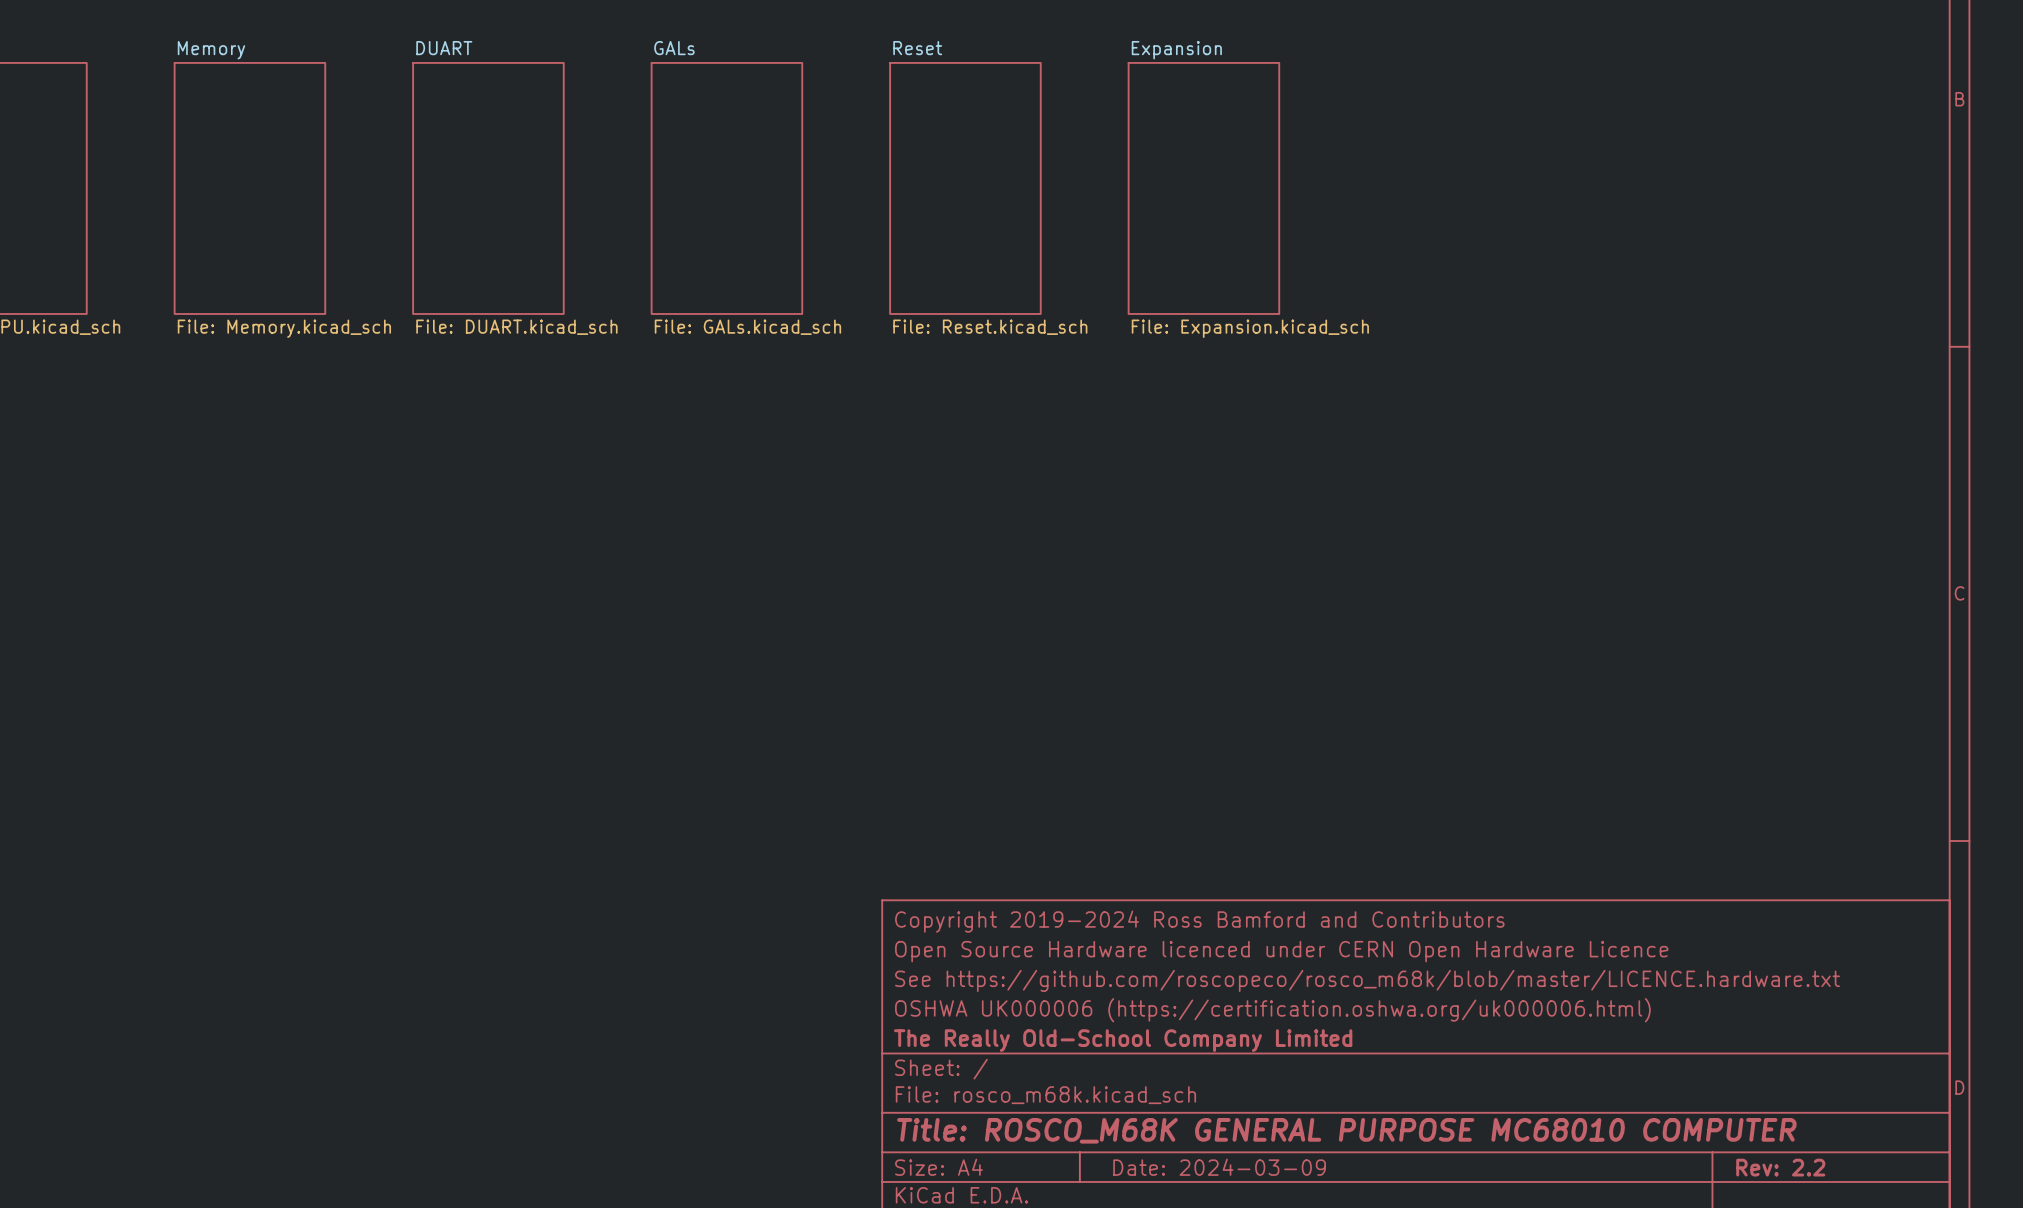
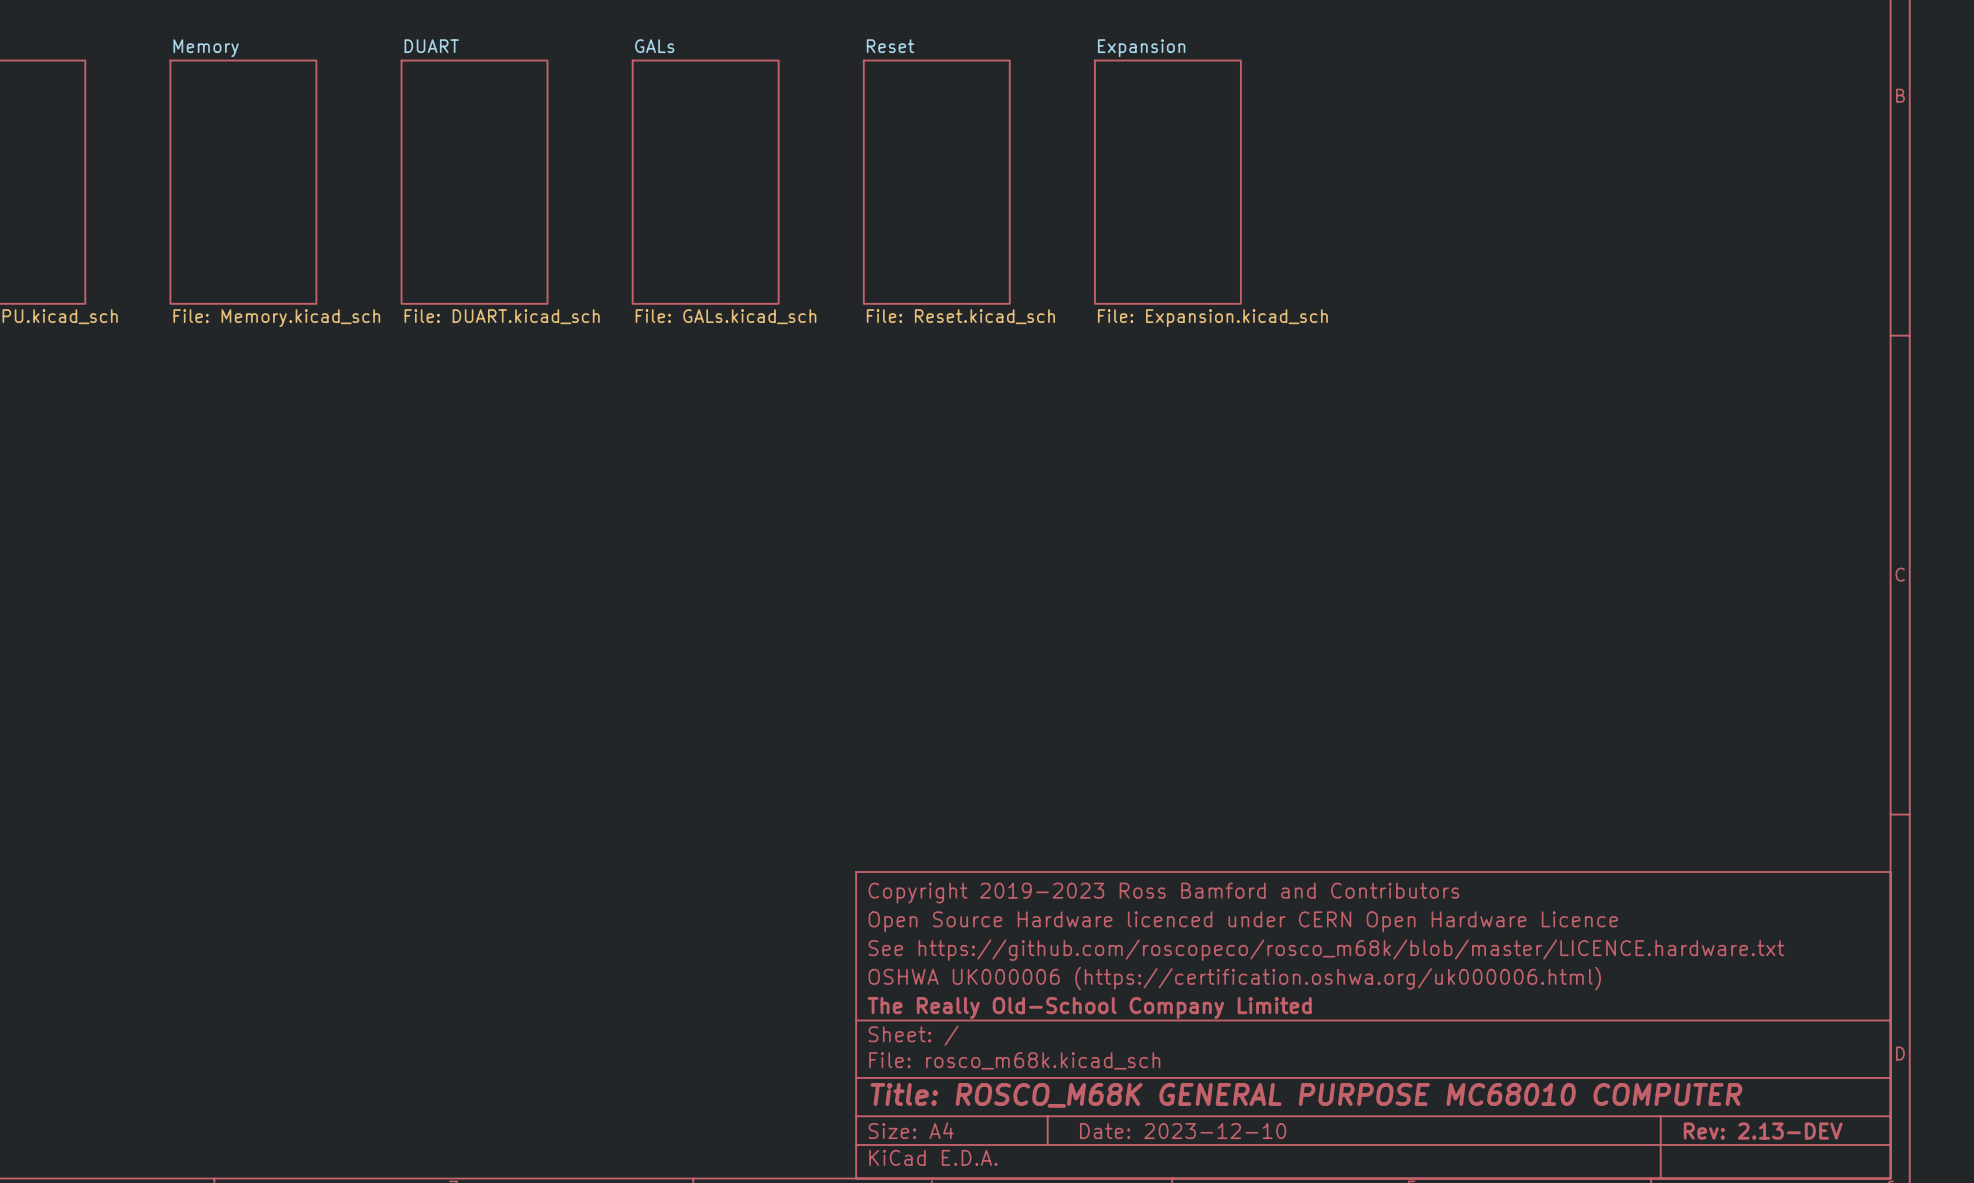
title block: Copyright 2019-2024 Ross Bamford and Contributors (1199, 921) -> Copyright 2019-2023 Ross Bamford and Contributors (1163, 893)
title block: Date: 2024-03-09 (1219, 1167) -> Date: 2023-12-10 (1183, 1131)
title block: Rev: 2.2 (1780, 1167) -> Rev: 2.13-DEV (1763, 1131)

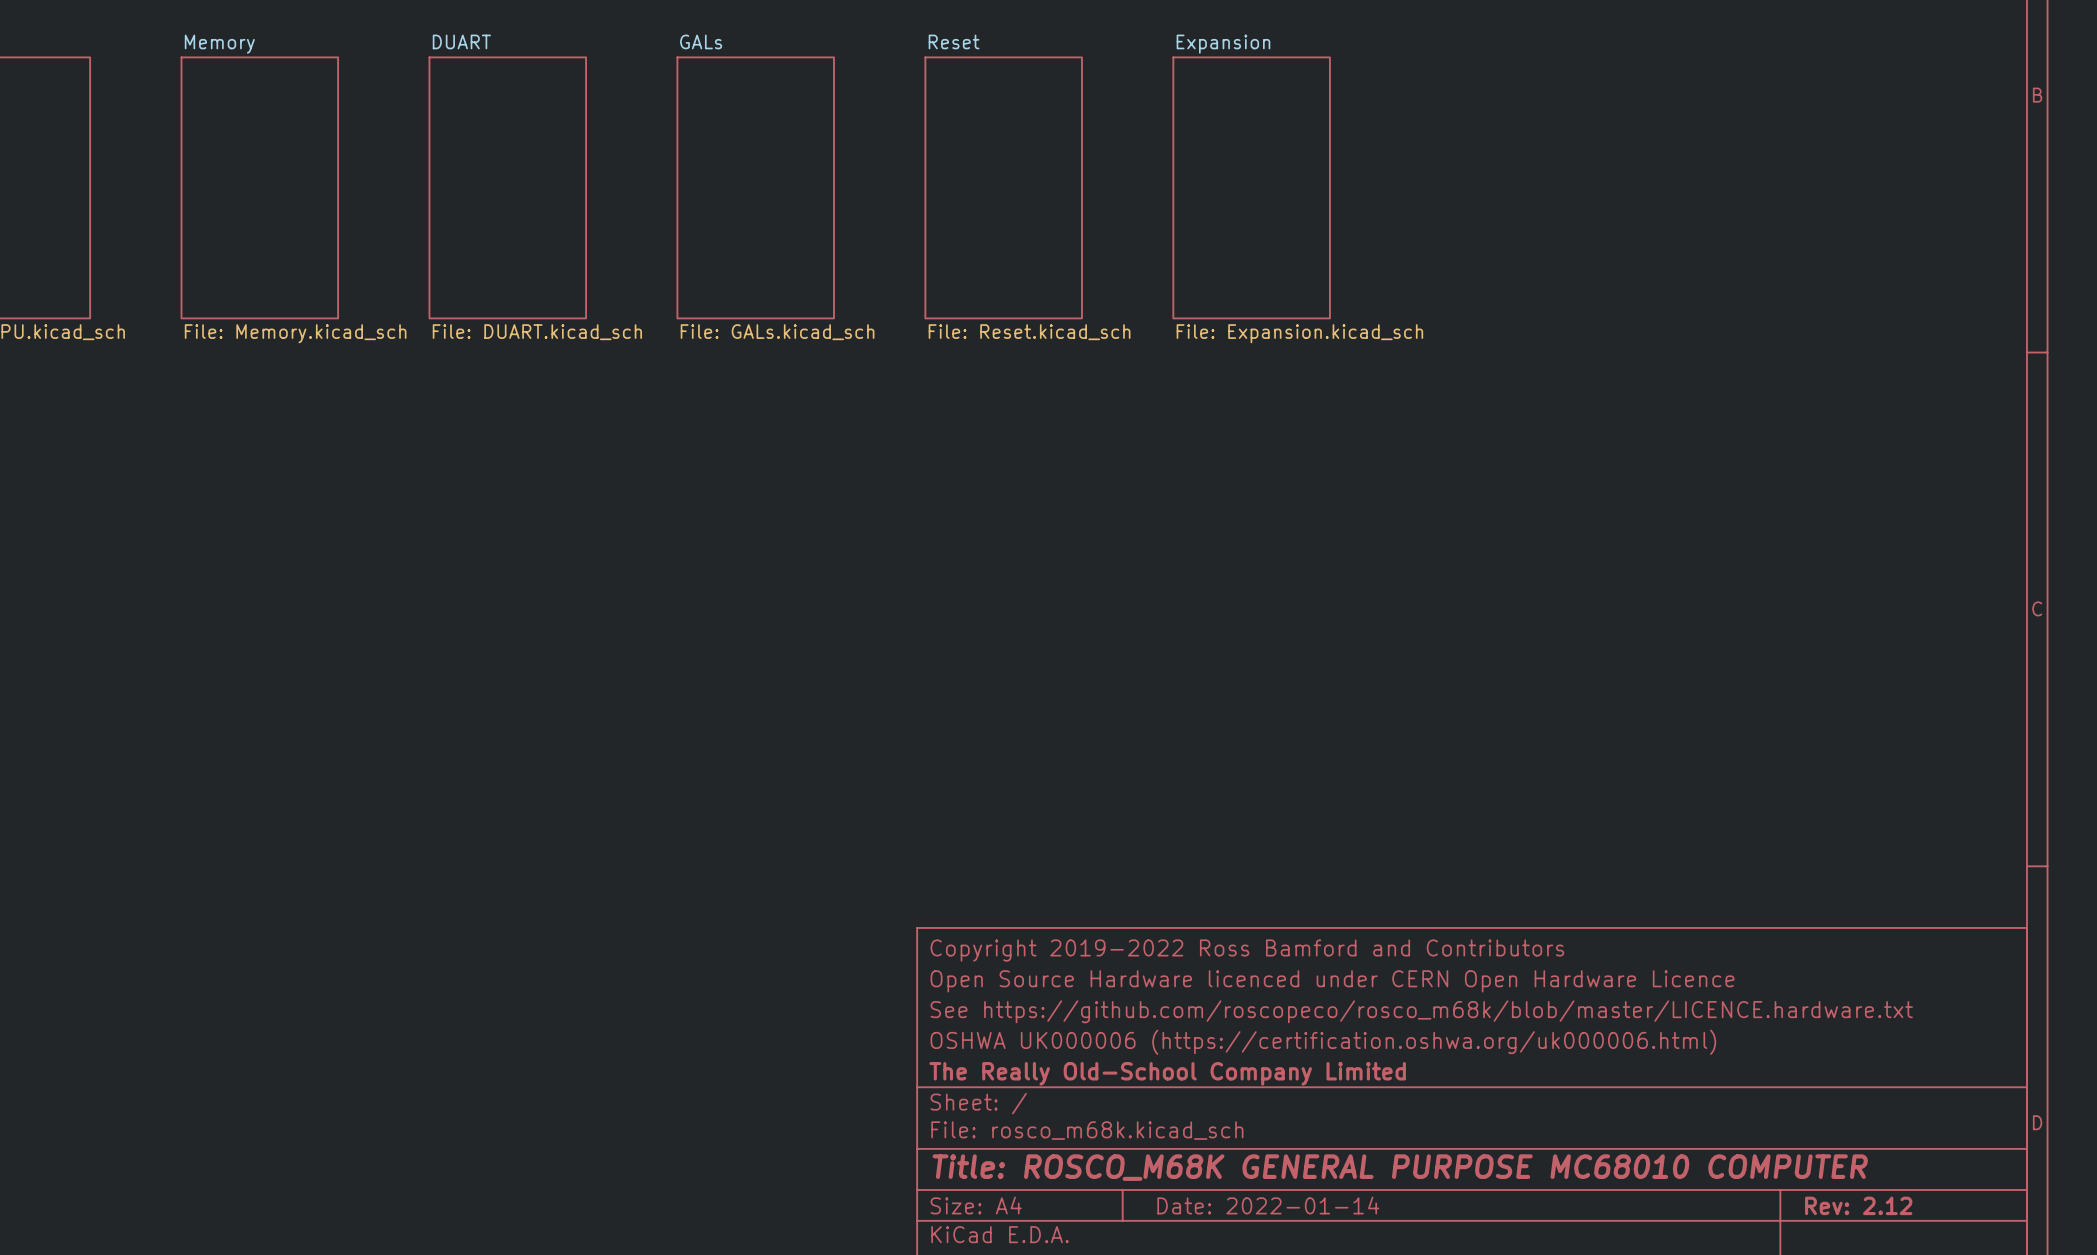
title block: Copyright 2019-2023 Ross Bamford and Contributors (1163, 893) -> Copyright 2019-2022 Ross Bamford and Contributors (1247, 950)
title block: Date: 2023-12-10 (1183, 1131) -> Date: 2022-01-14 (1268, 1205)
title block: Rev: 2.13-DEV (1763, 1131) -> Rev: 2.12 (1858, 1205)

